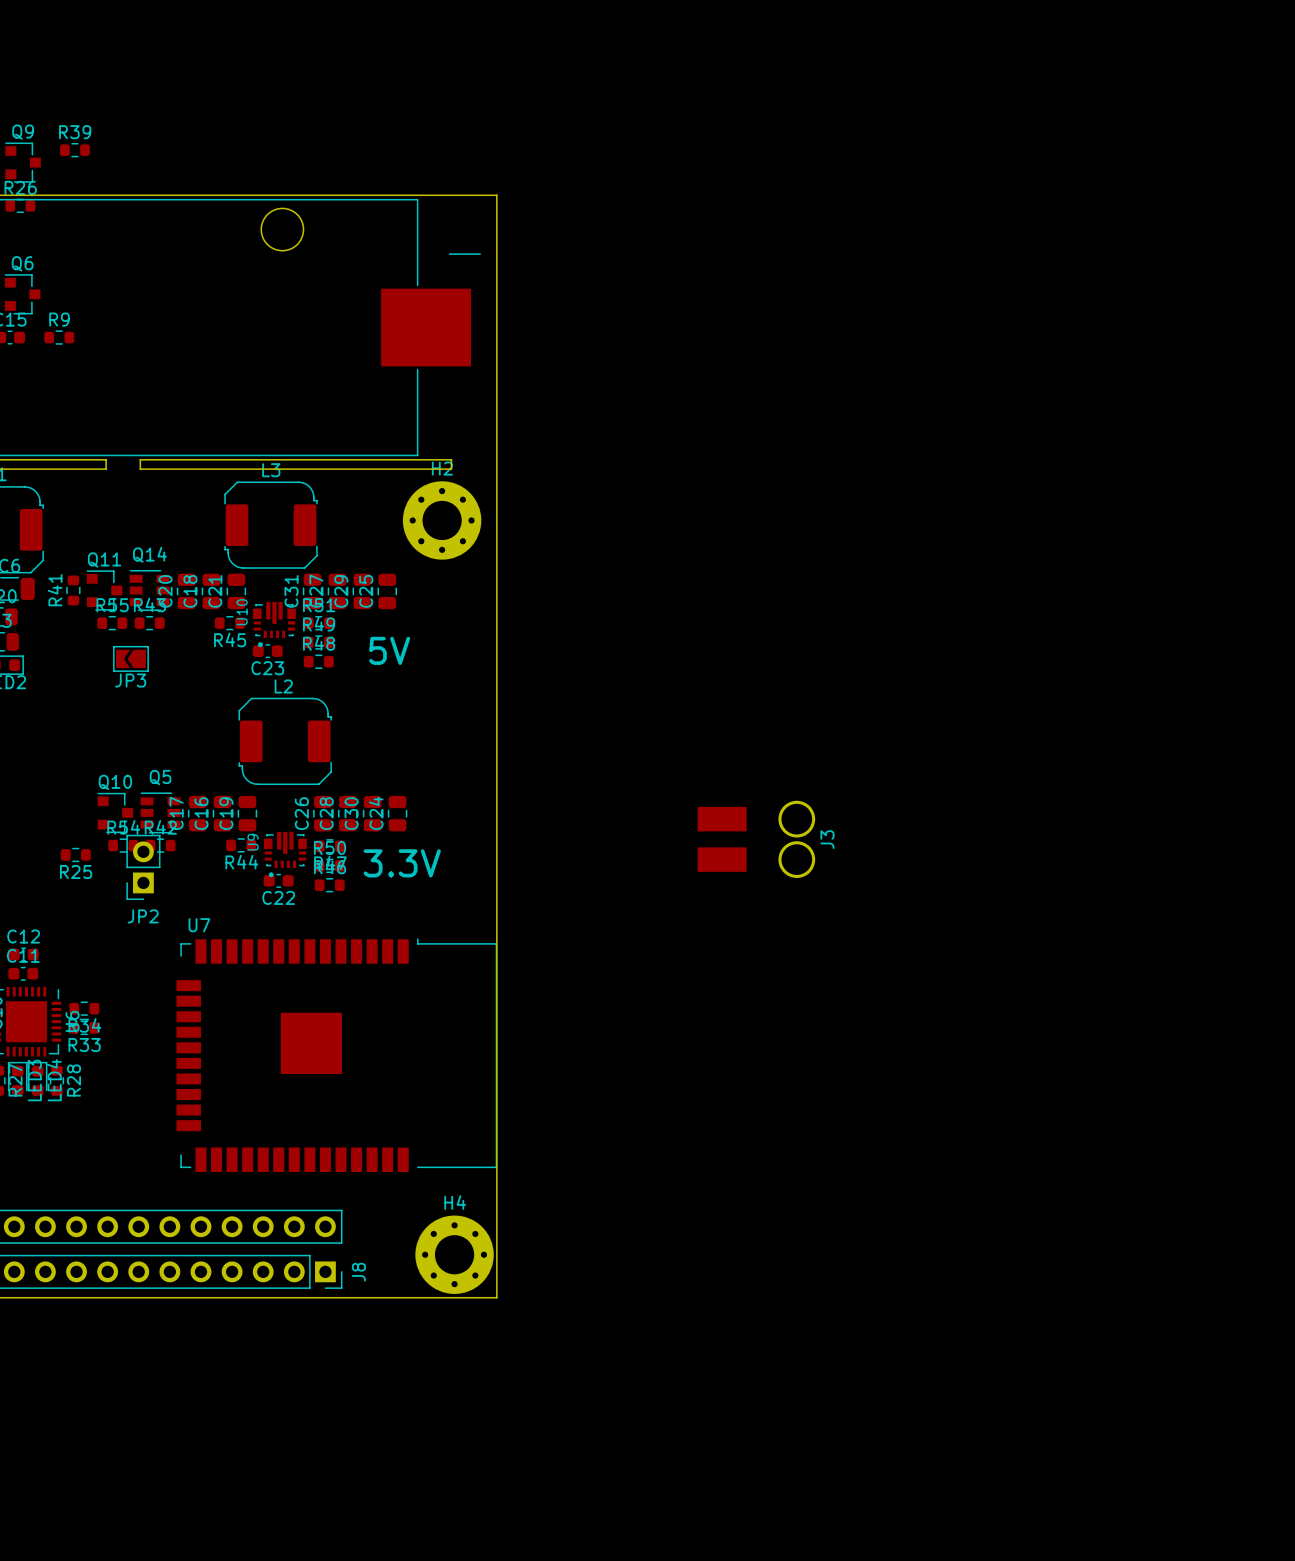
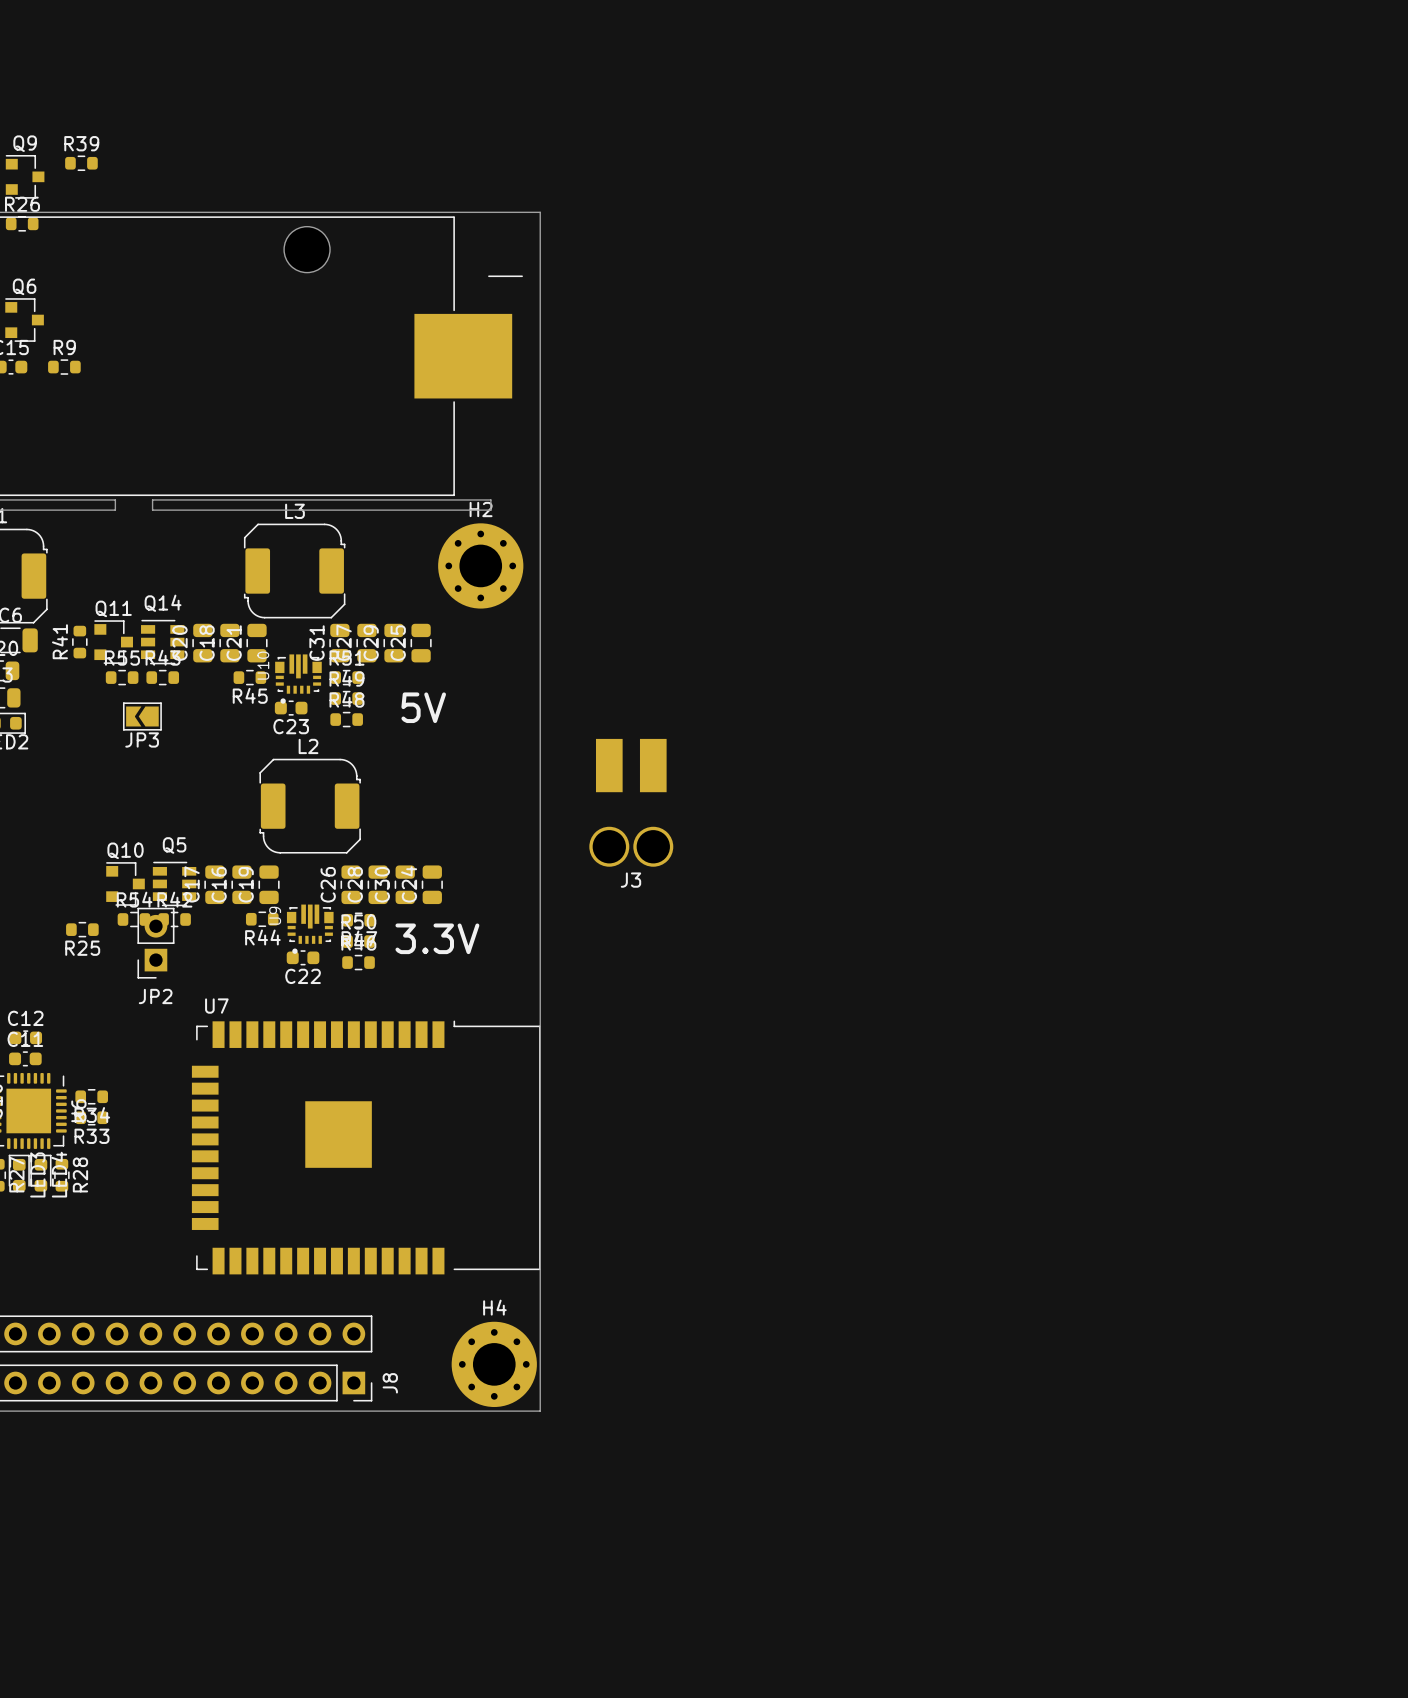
J3 rotation: 0° (756, 839) -> 90° clockwise (631, 802)
J3 position: (756, 839) -> (631, 802)

